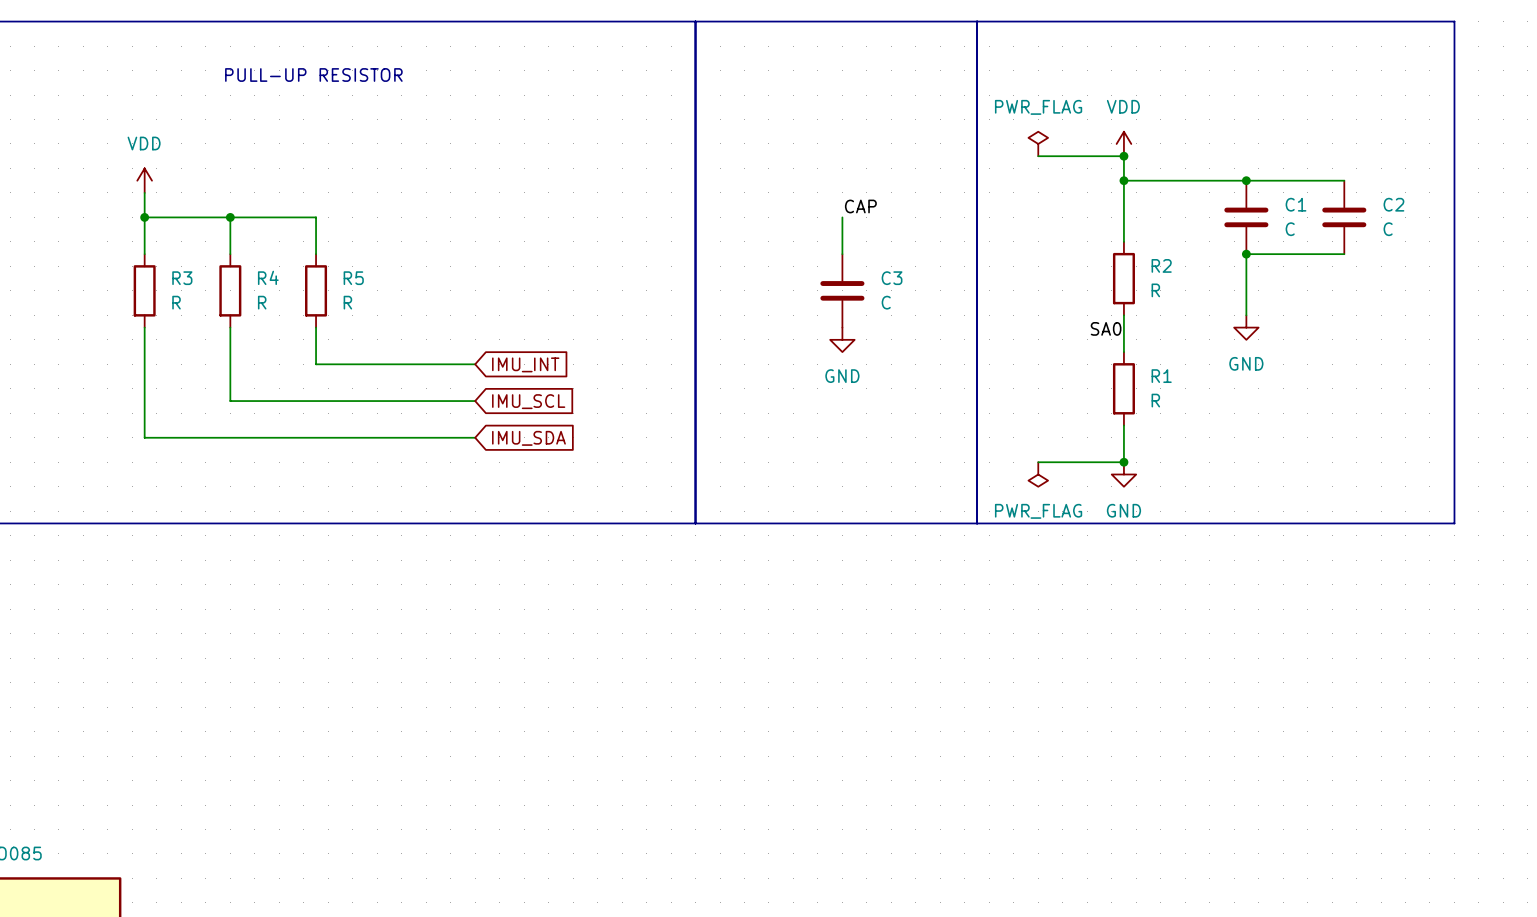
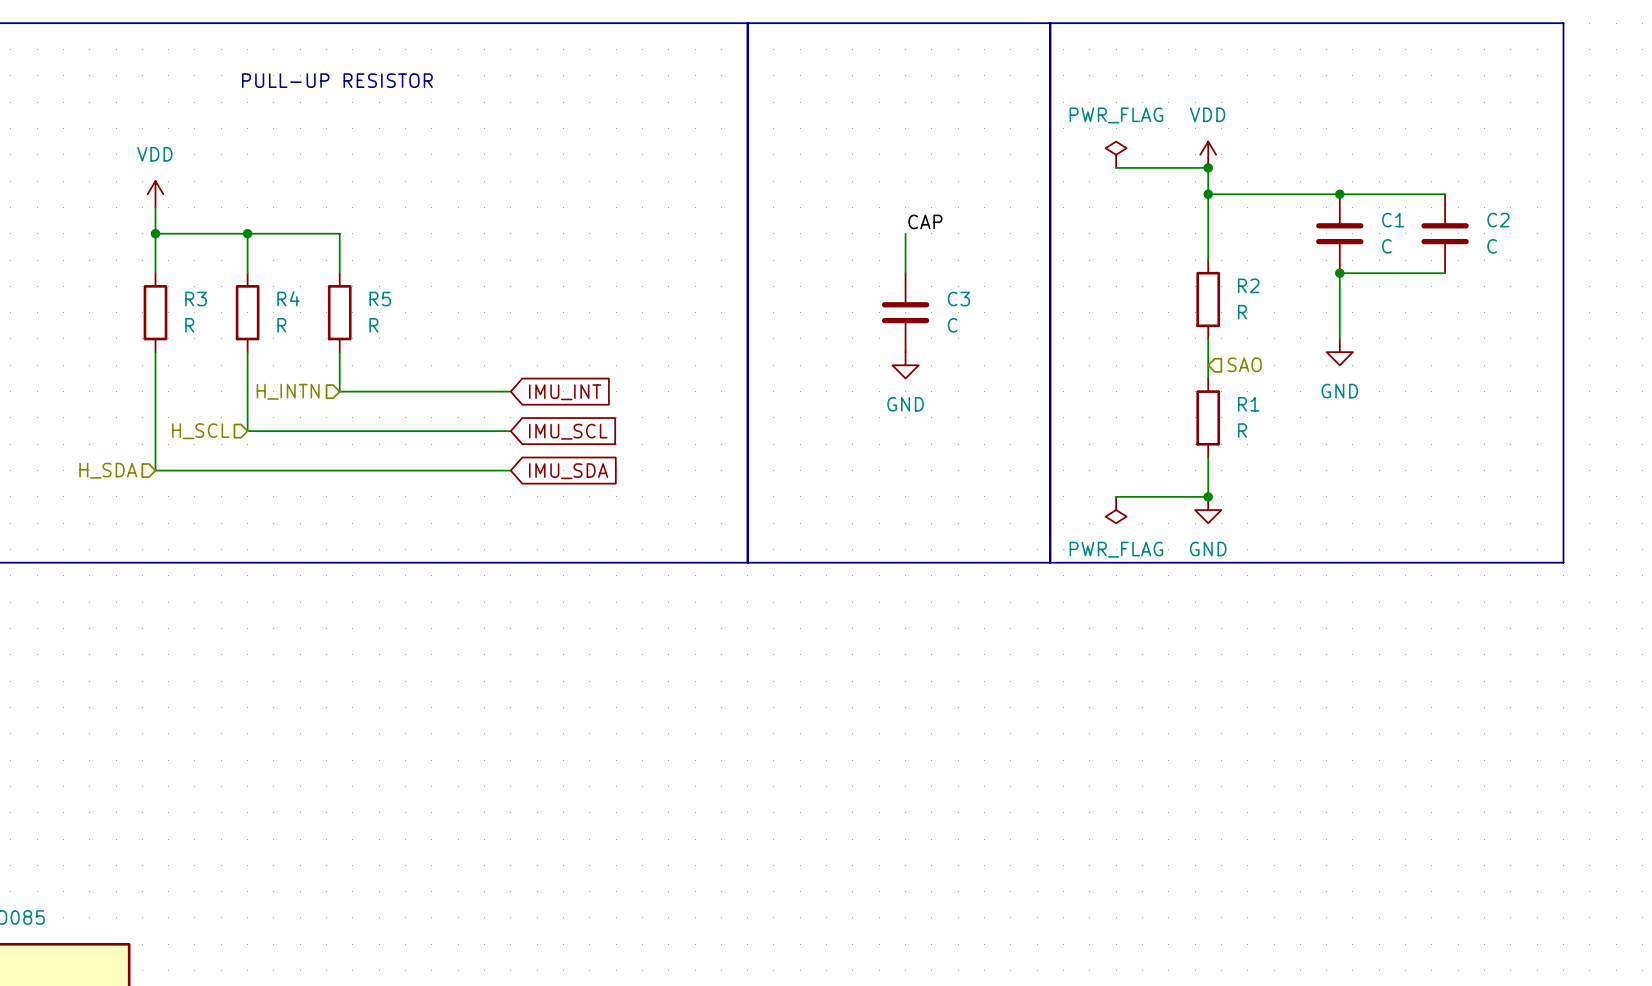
label: SA0 (1106, 328) -> none
hierarchical label: none -> SAO (1244, 364)
hierarchical label: none -> H_INTN (288, 391)
hierarchical label: none -> H_SCL (200, 431)
hierarchical label: none -> H_SDA (108, 470)

